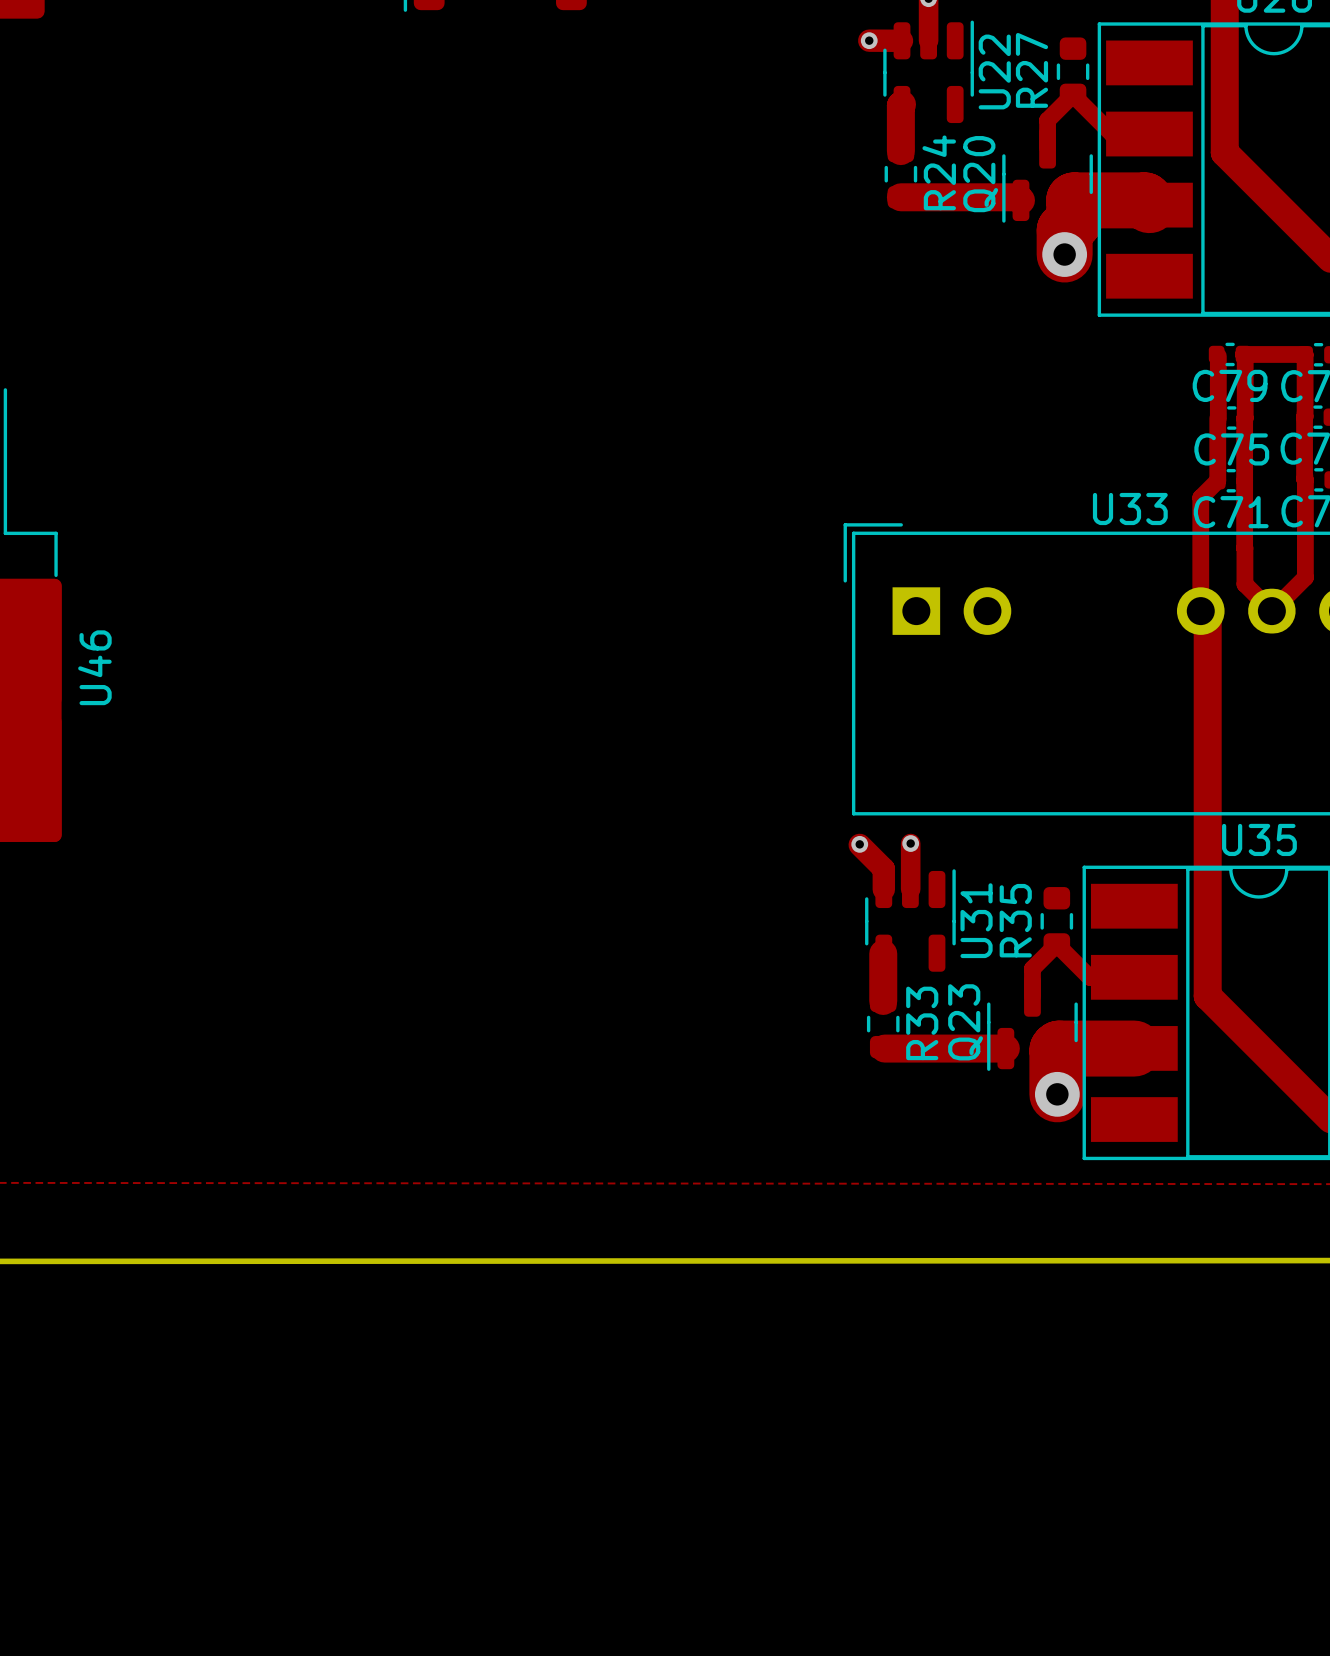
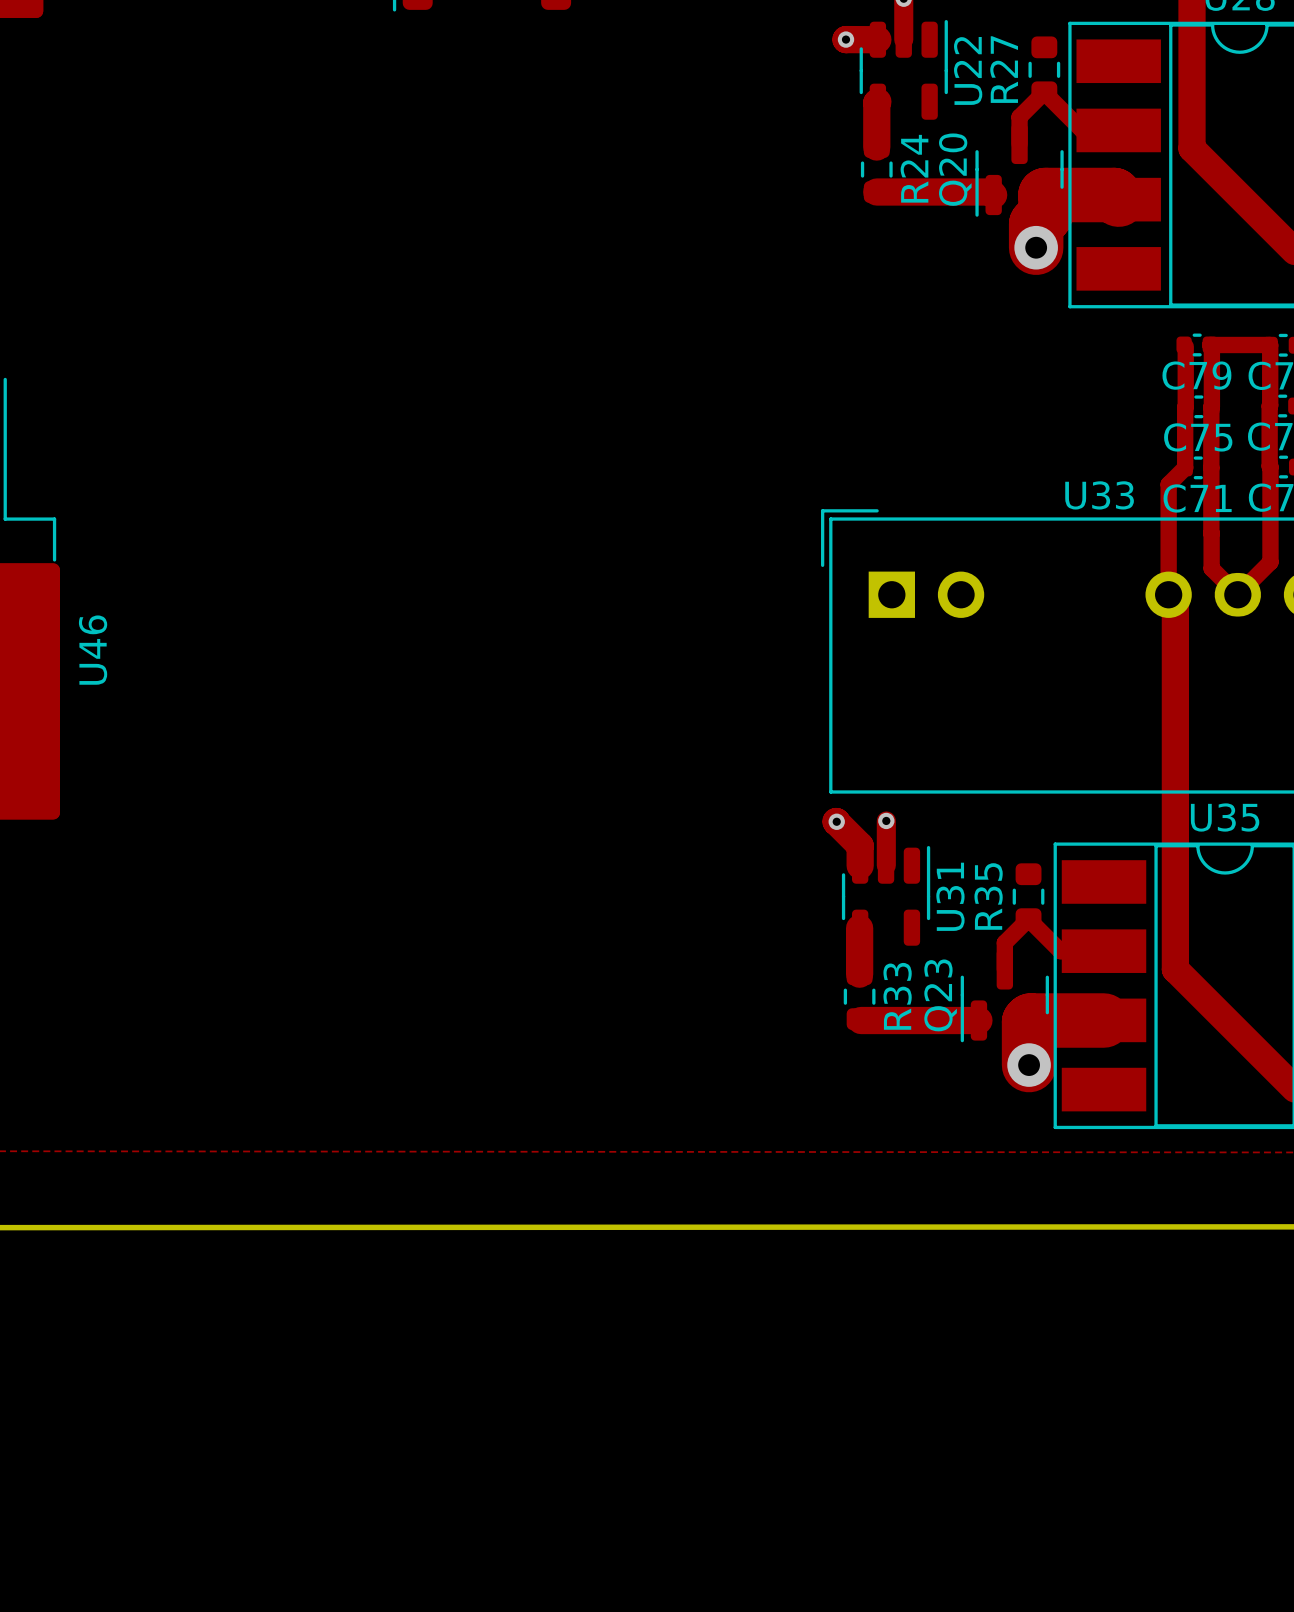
track width: thin (869, 40) (902, 40) -> thick (846, 39) (877, 39)
track width: thin (859, 844) (883, 868) (883, 889) -> thick (836, 822) (860, 845) (860, 865)

